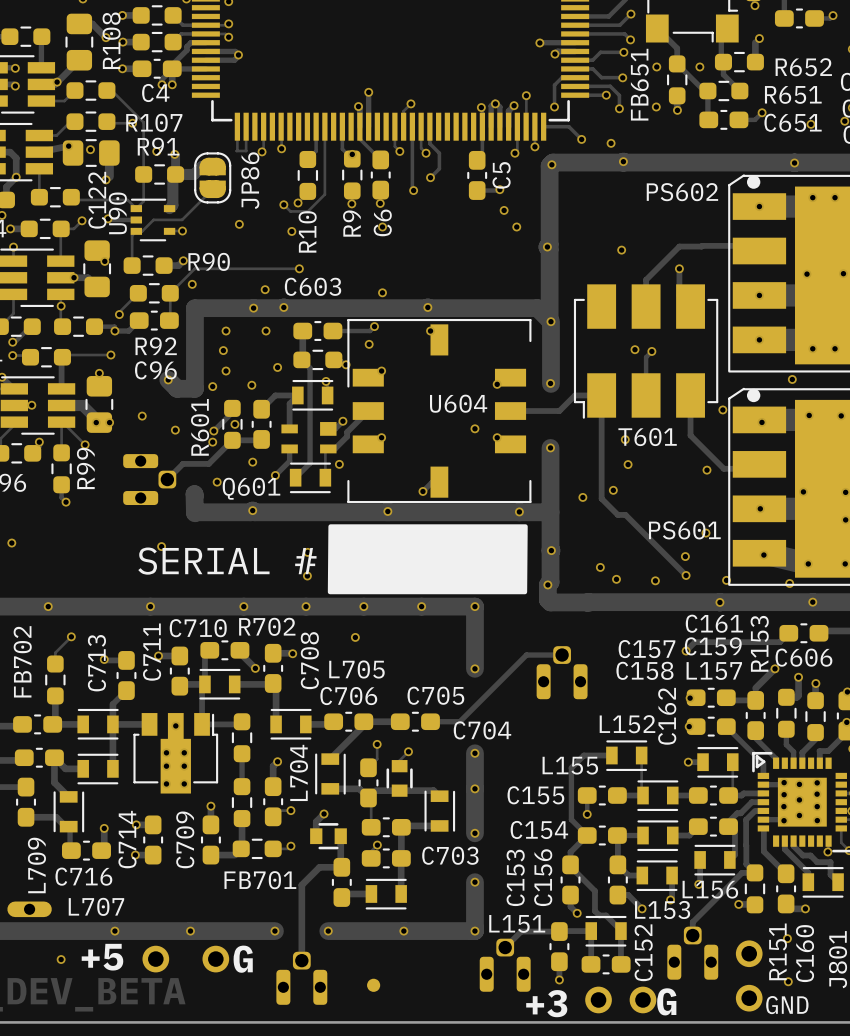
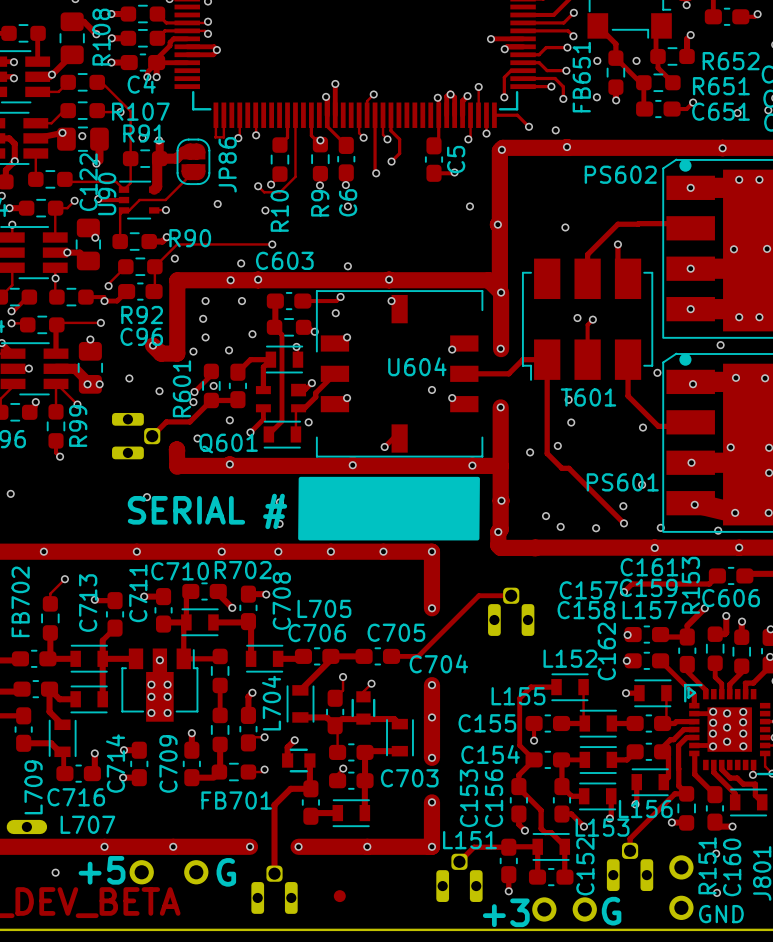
via: (504, 210) -> none
via: (355, 637) -> none

